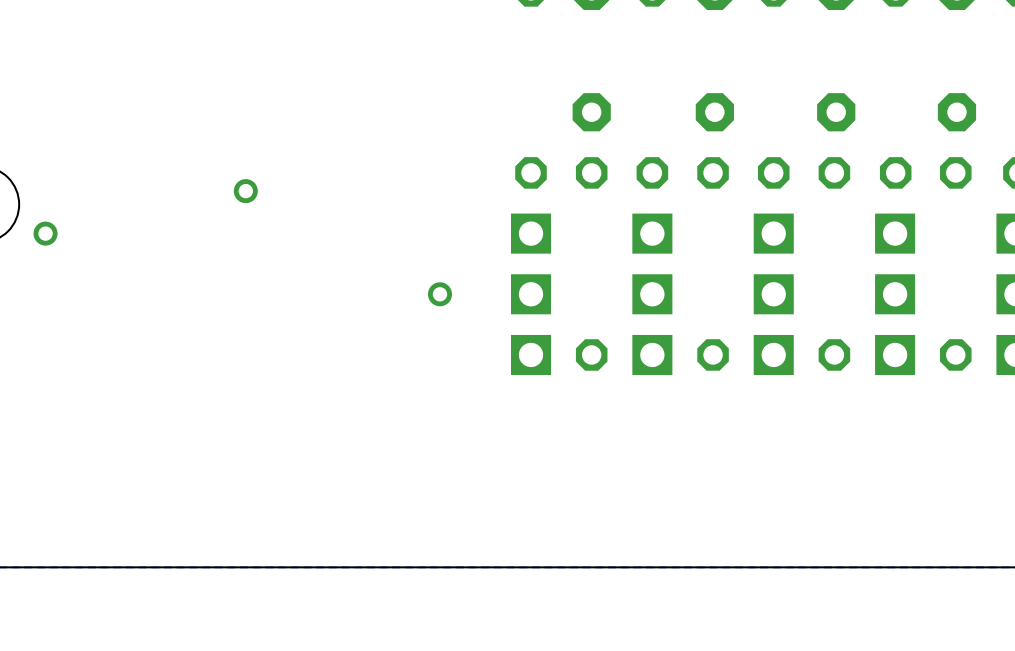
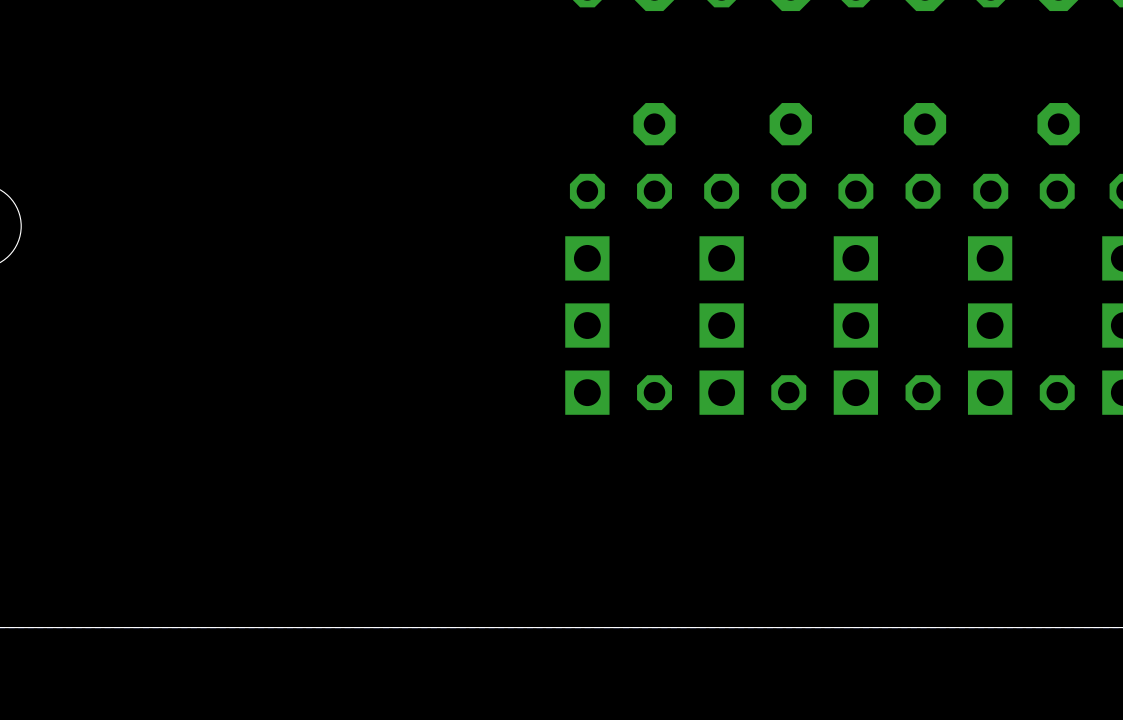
via: (245, 191) -> none
via: (45, 233) -> none
via: (439, 294) -> none

